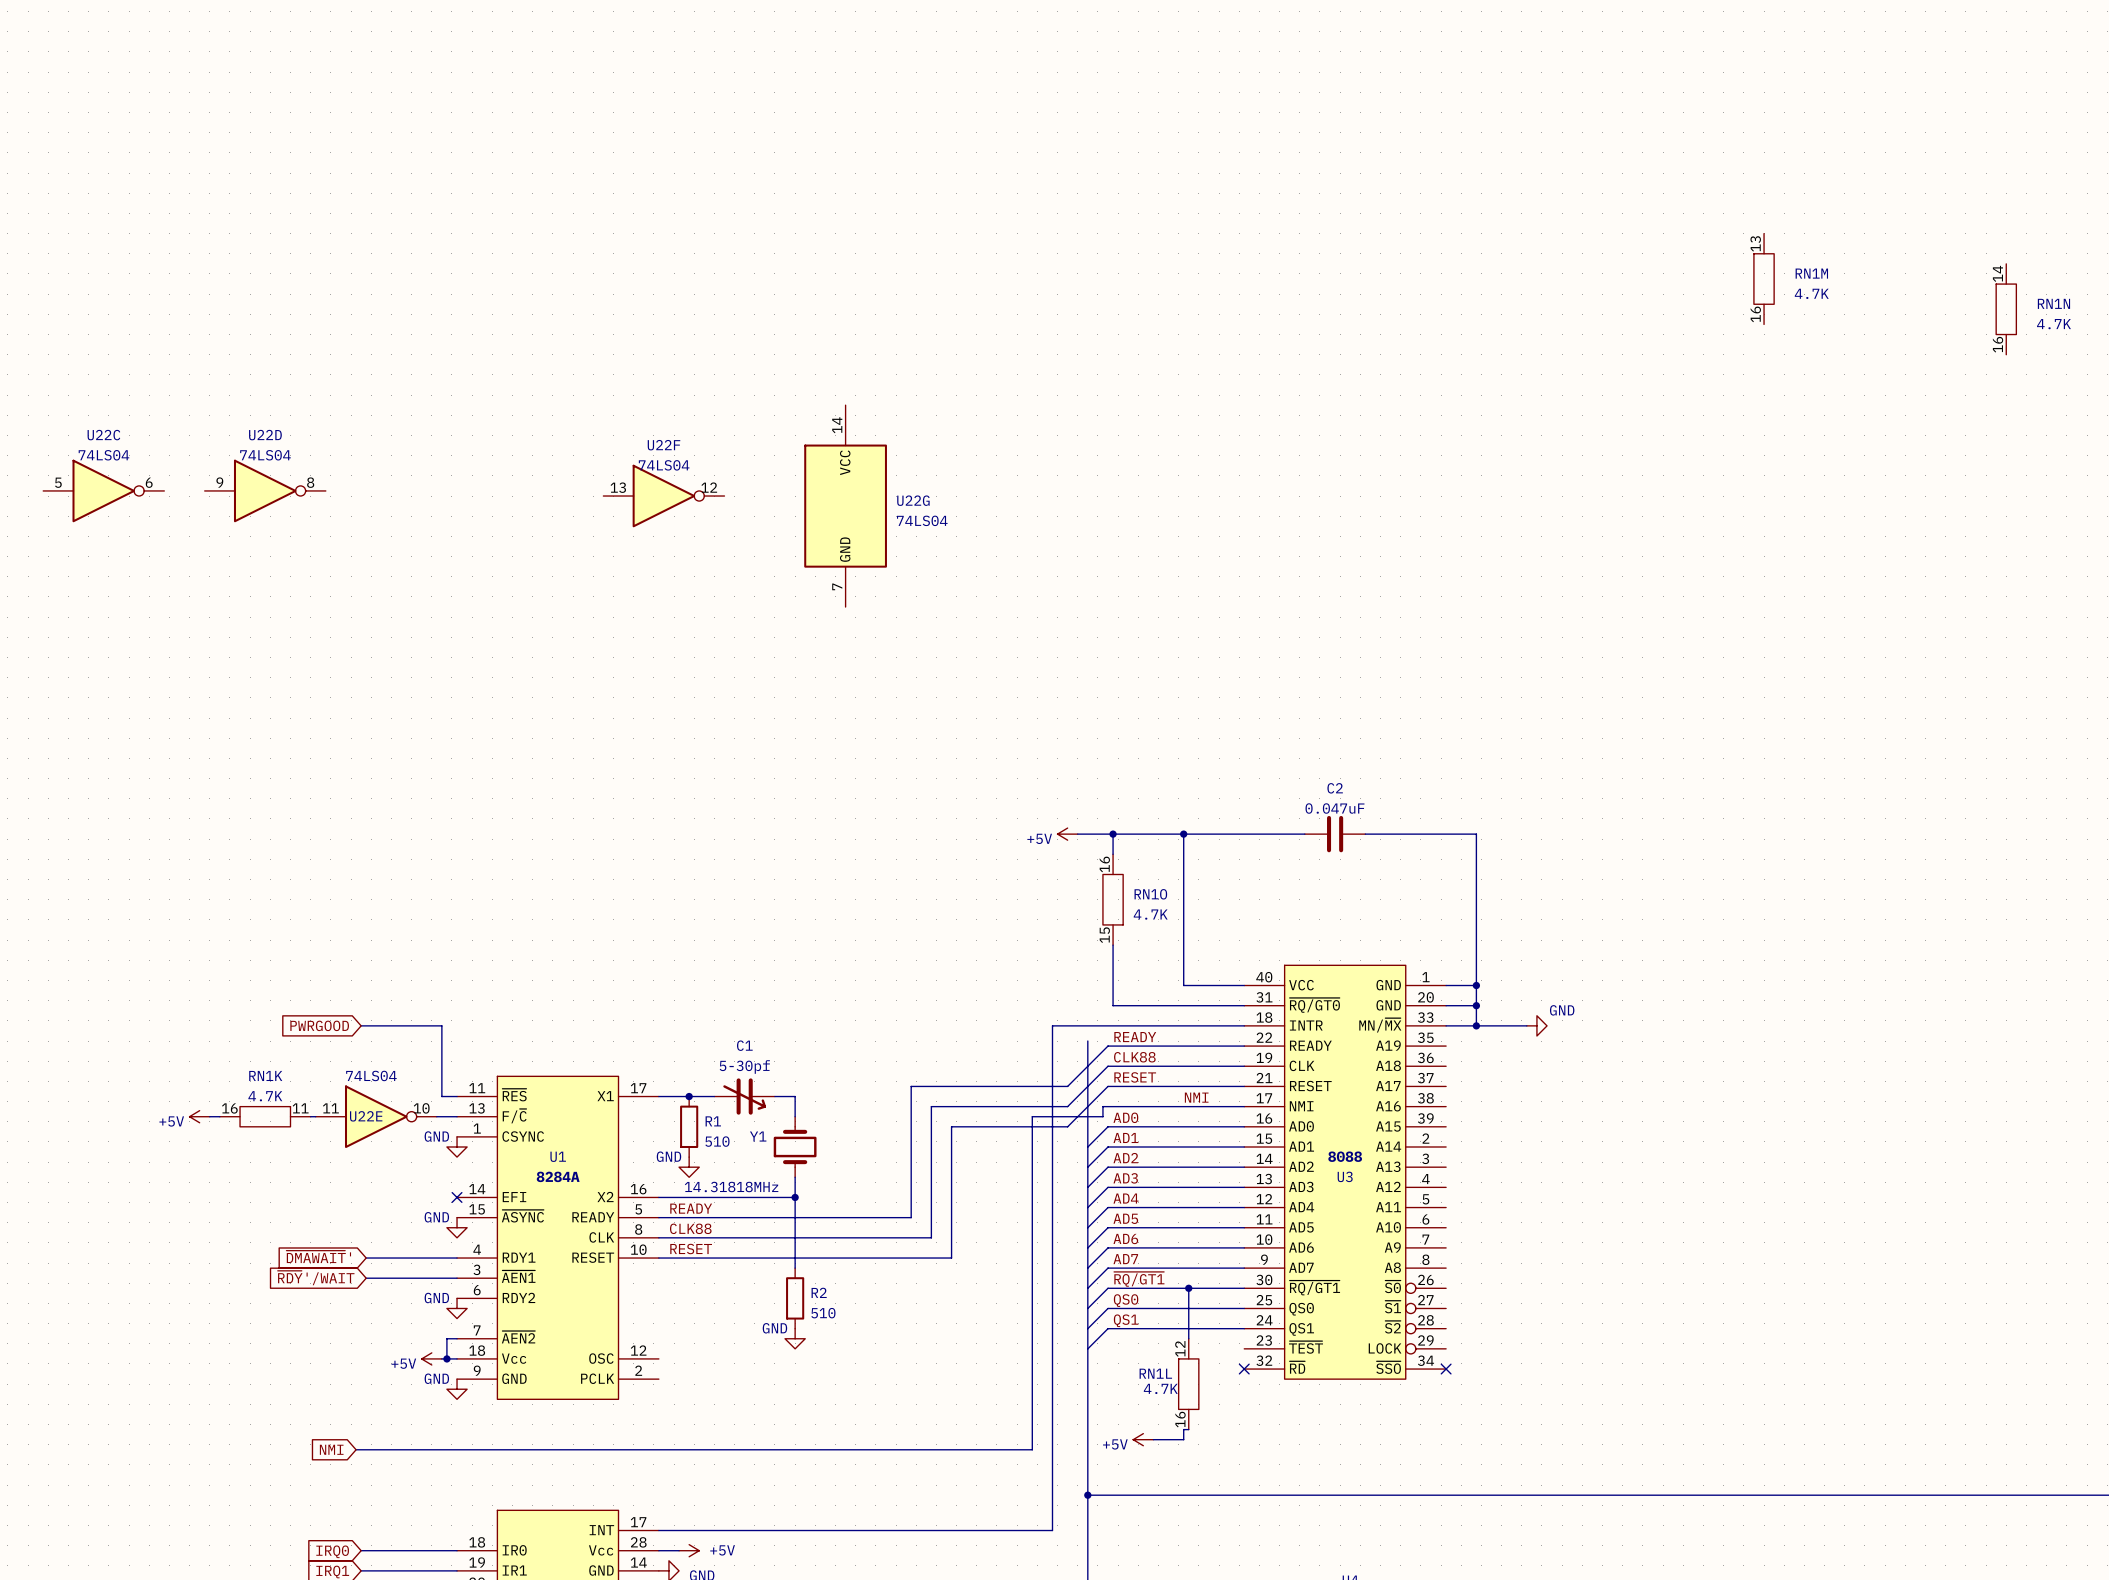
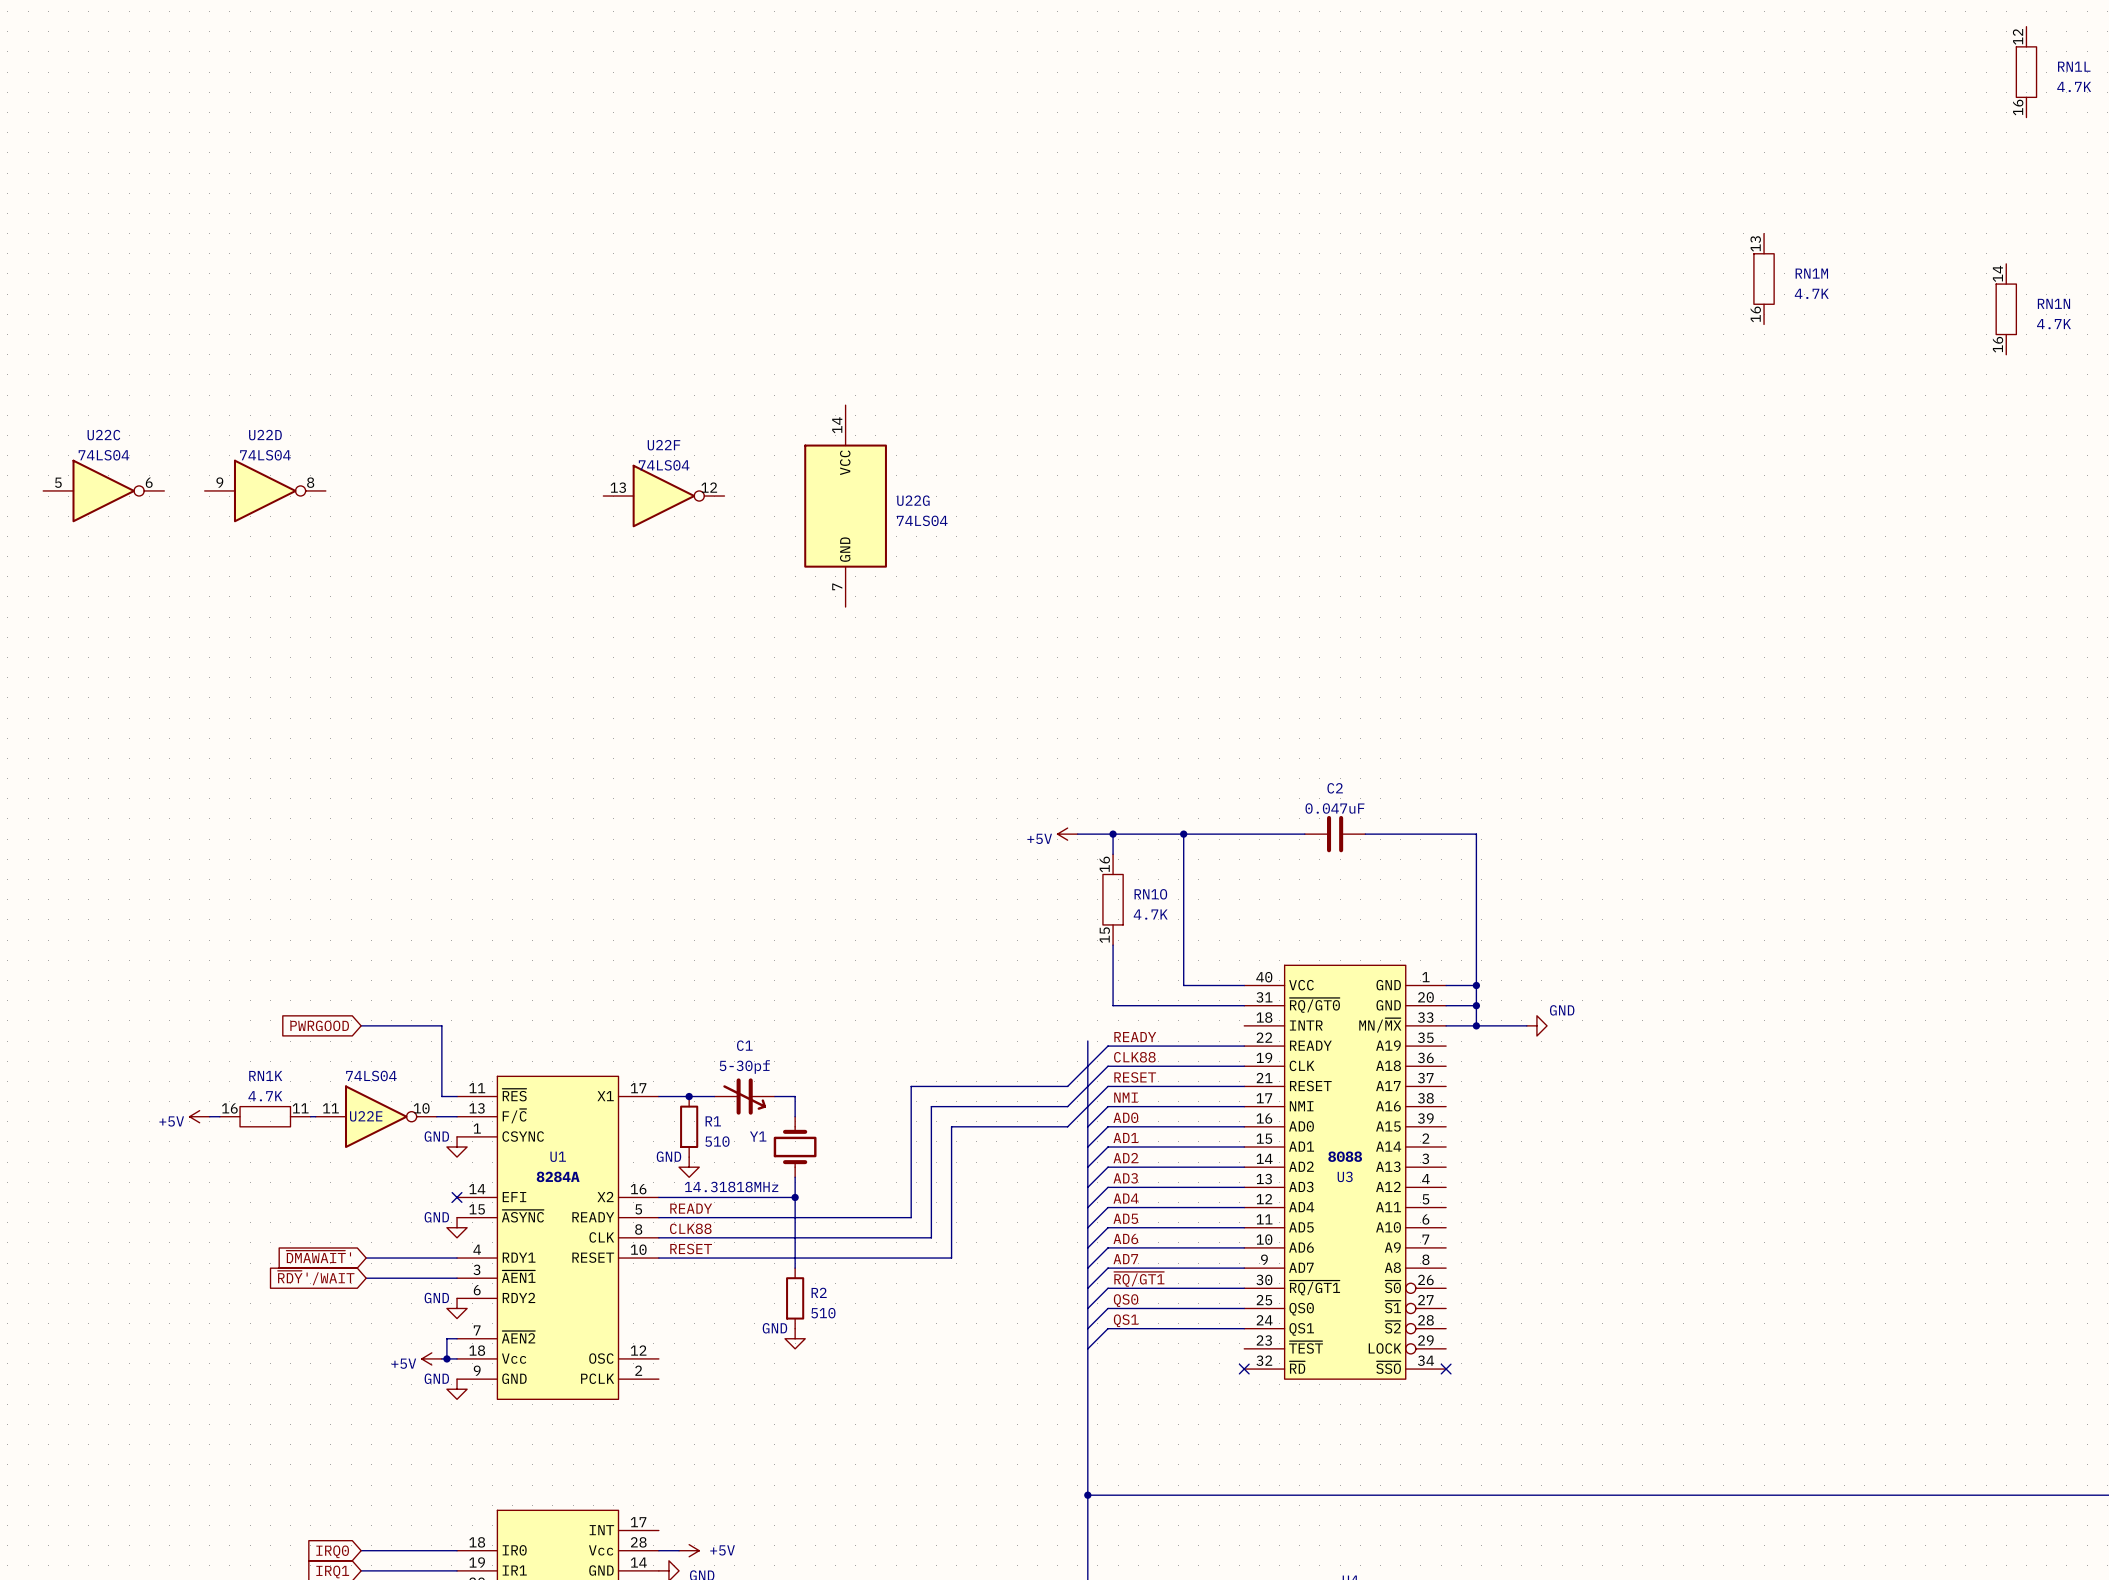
wire: (1244, 1025) (1052, 1025) (1052, 1530) (658, 1530) -> none
label position: NMI (1196, 1097) -> NMI (1126, 1097)
wire: (1108, 1106) (1102, 1106) (1102, 1116) (1032, 1116) (1032, 1449) (356, 1449) -> (1108, 1106) (1087, 1126)
wire: (1188, 1288) (1188, 1338) -> none
junction: (1188, 1288) -> none
RN1L name position: RN1L (1155, 1373) -> RN1L (2074, 66)
RN1L position: (1188, 1384) -> (2026, 72)
RN1L value position: 4.7K (1160, 1388) -> 4.7K (2074, 86)
wire: (1188, 1429) (1183, 1429) (1183, 1439) (1153, 1439) -> none
power symbol: +5V (1143, 1439) -> none
global label: NMI (331, 1449) -> none

